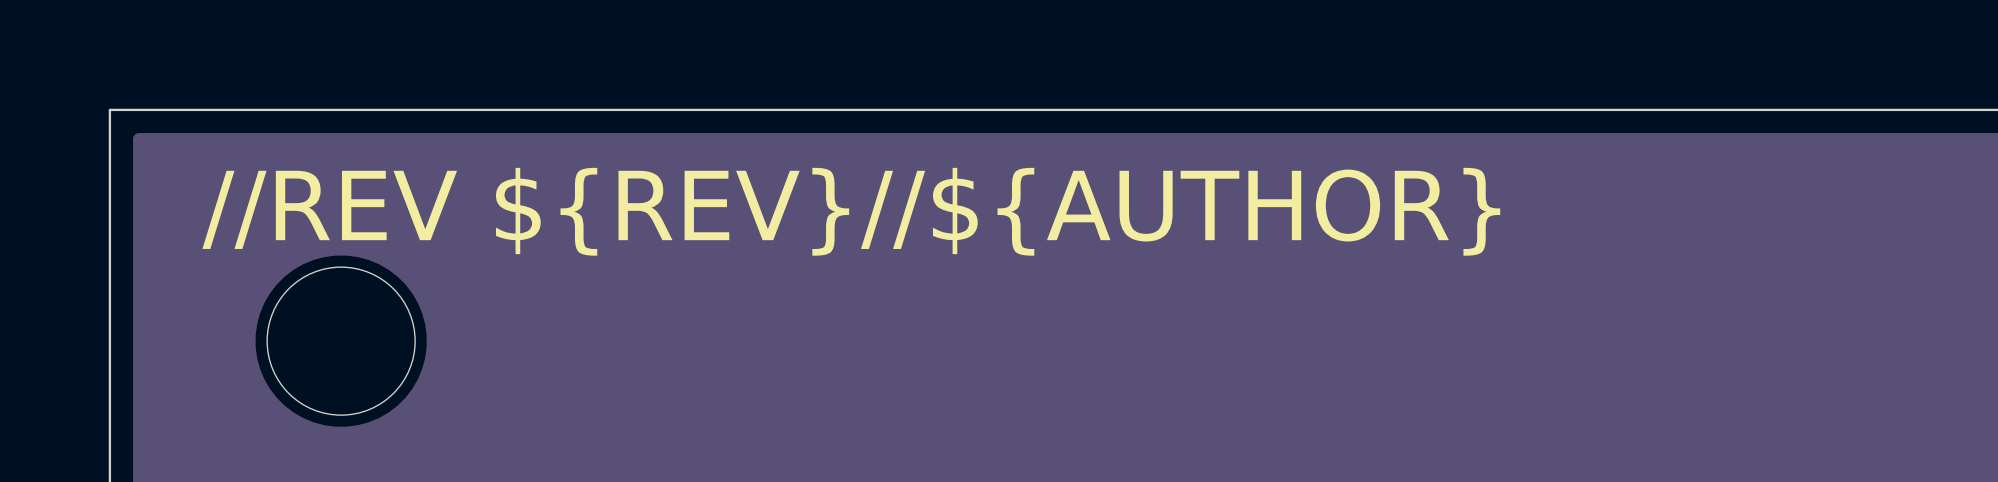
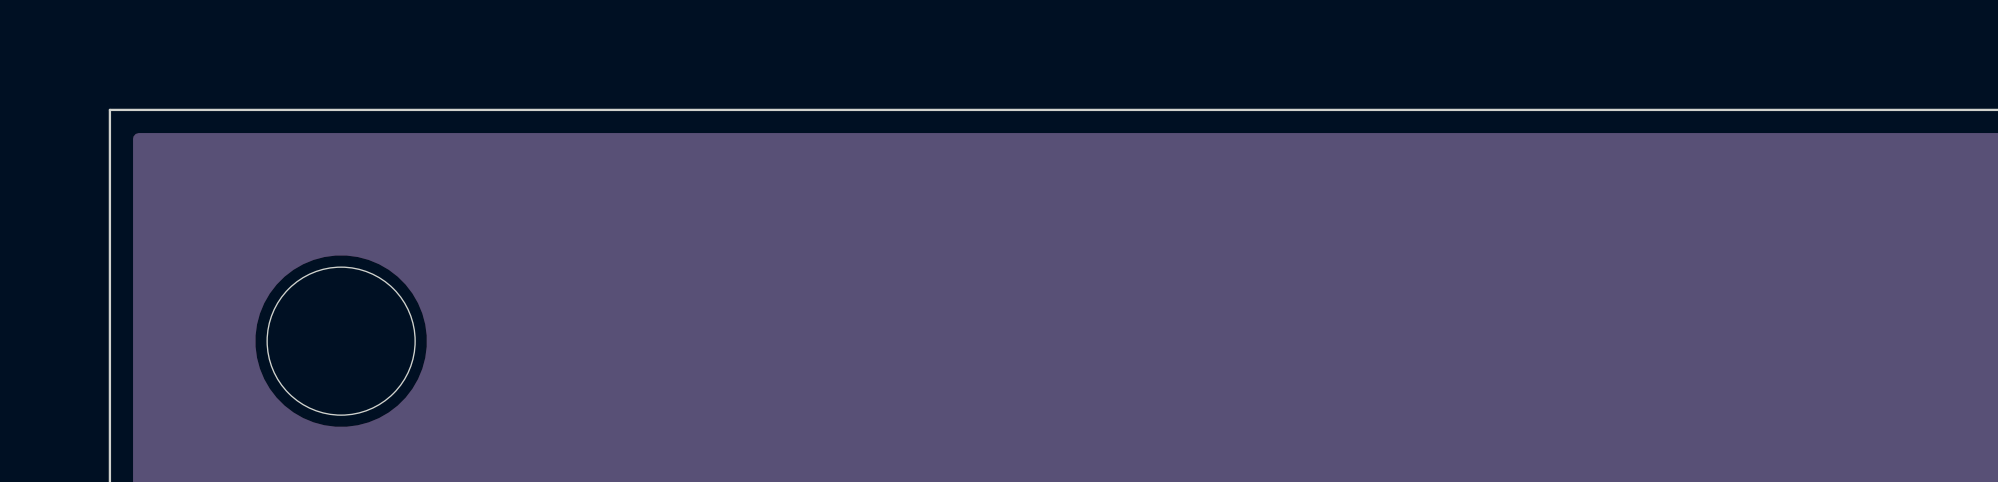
text: //REV ${REV}//${AUTHOR} (851, 211) -> none

